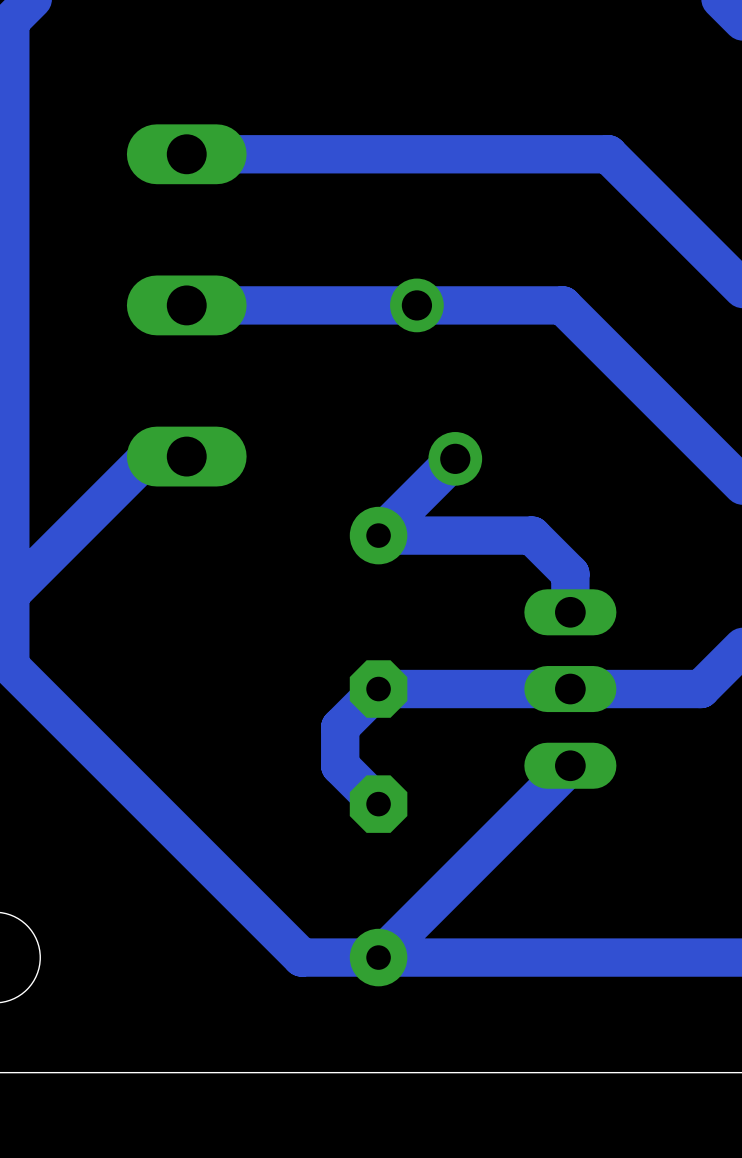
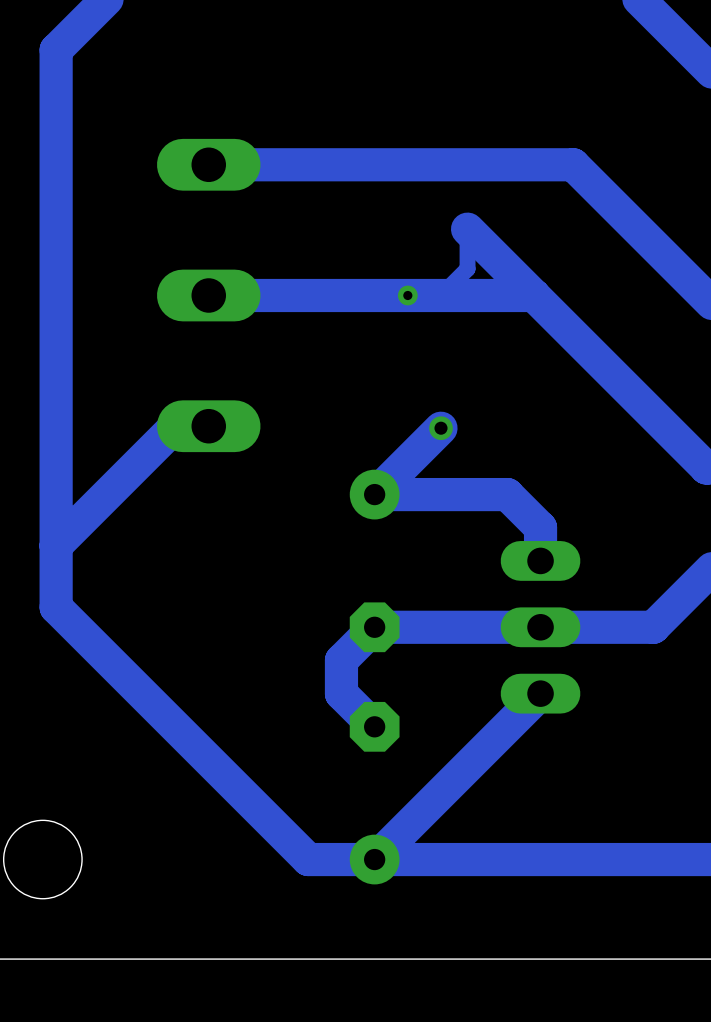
via size: [390, 278, 444, 333] -> [397, 285, 418, 306]
track: none -> (533, 295) (467, 229) (467, 268) (441, 295) (407, 295)
via size: [428, 432, 483, 486] -> [429, 416, 453, 441]

